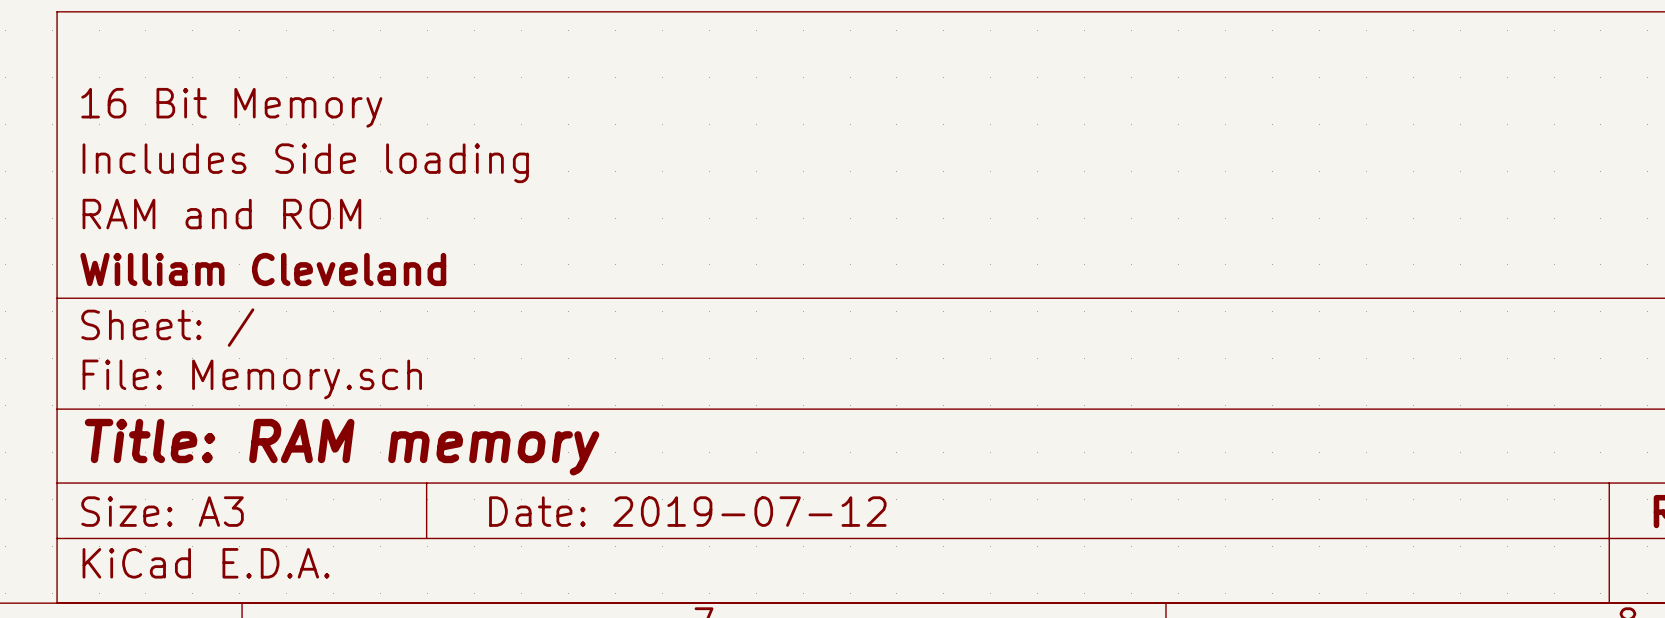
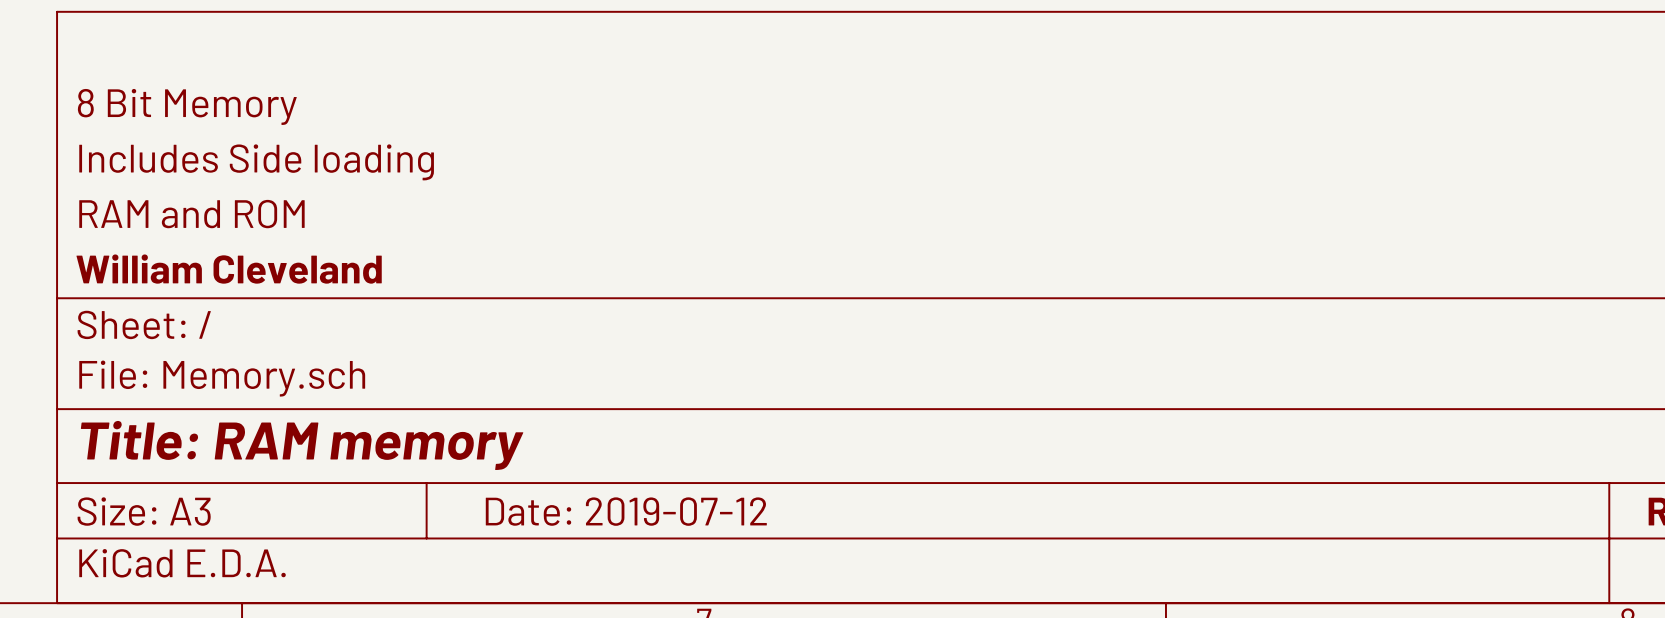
title block: 16 Bit Memory (231, 107) -> 8 Bit Memory (187, 106)

